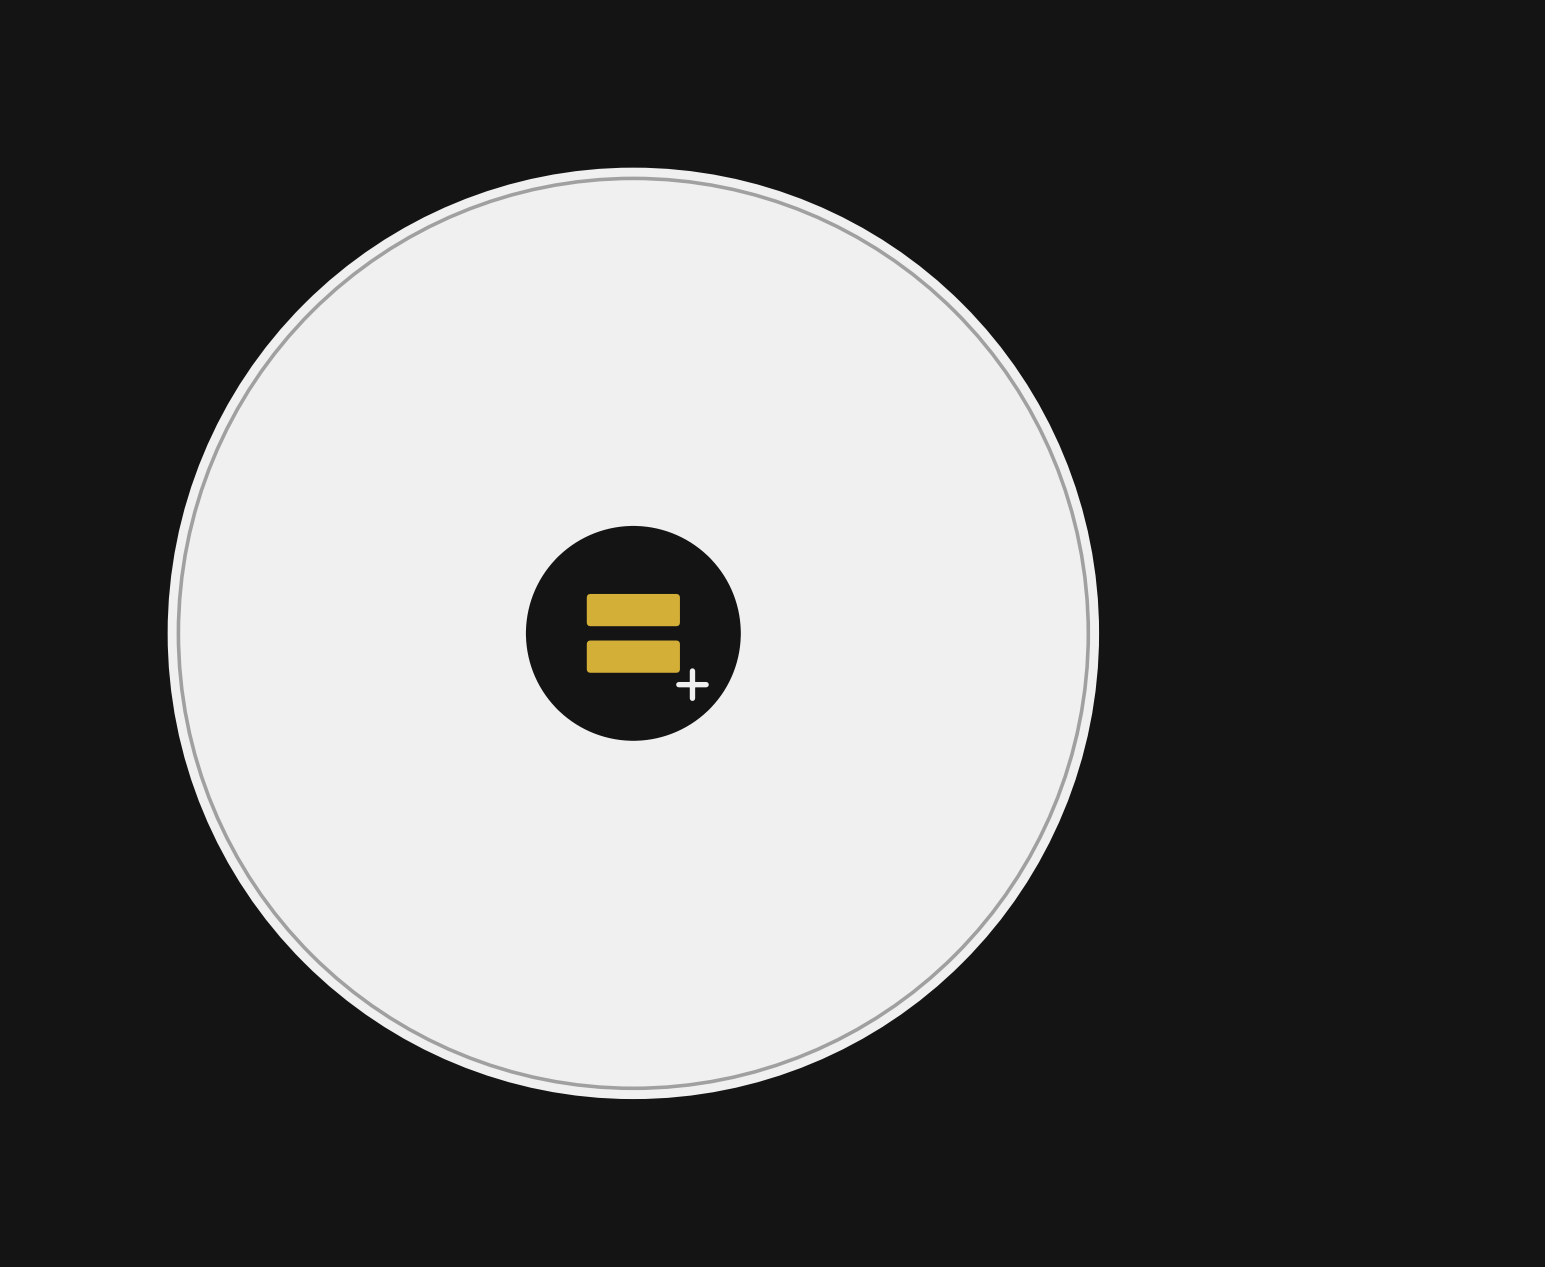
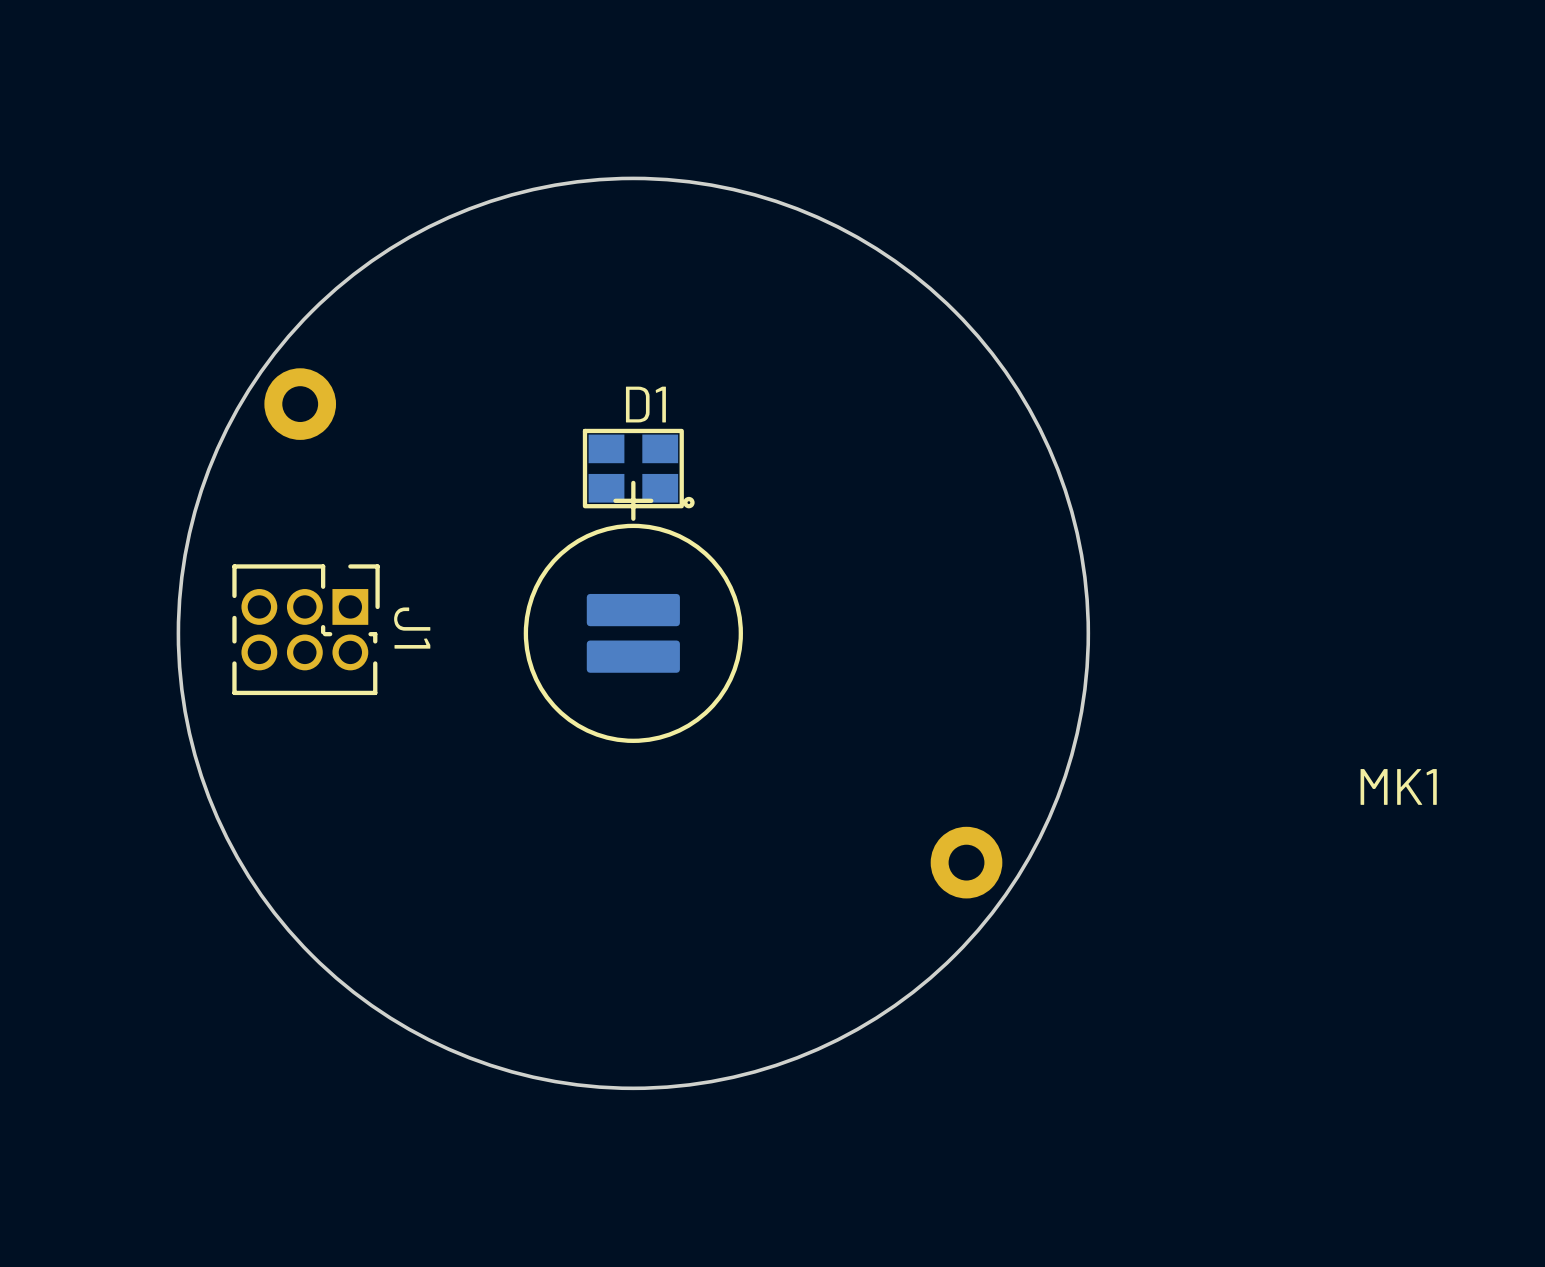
drawing: [167, 167, 1100, 1100] -> none
D1: none -> (638, 468)
MK1: none -> (633, 611)
J1: none -> (306, 629)
text: + (692, 684) -> none

